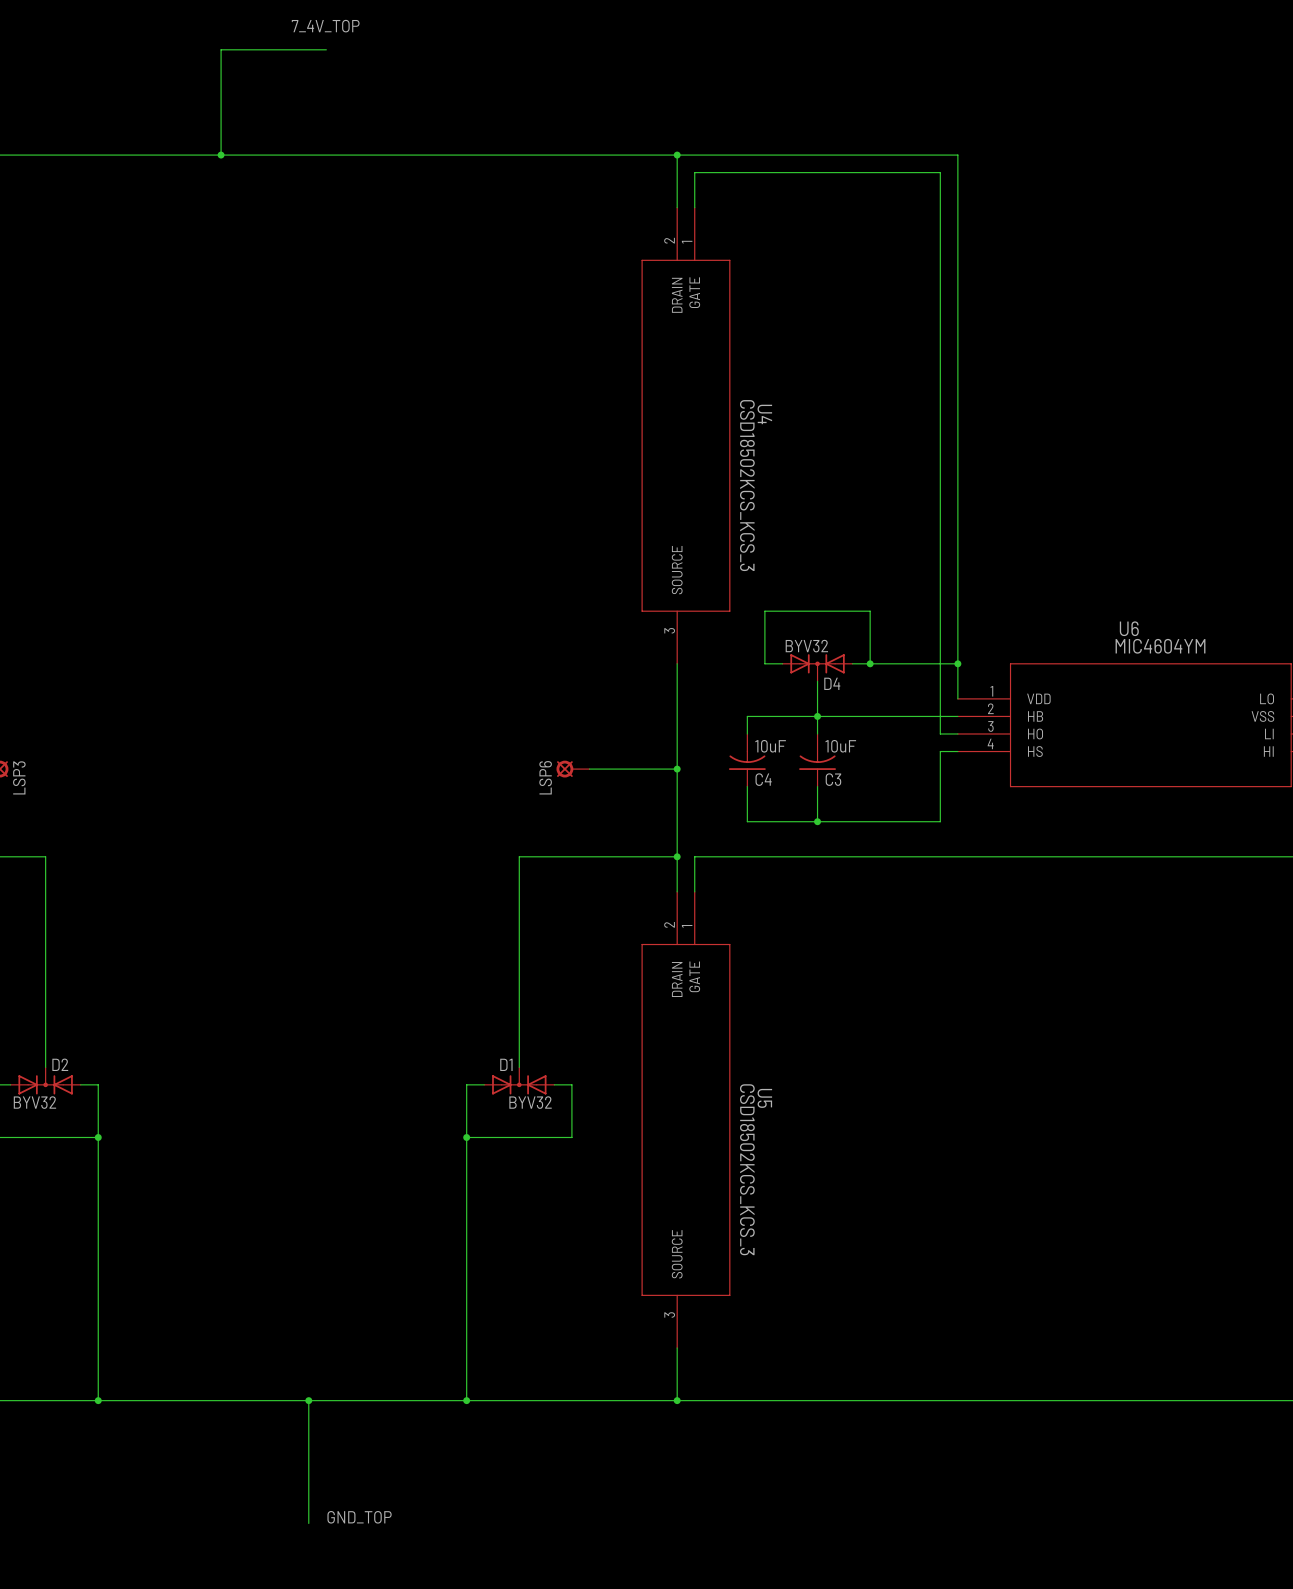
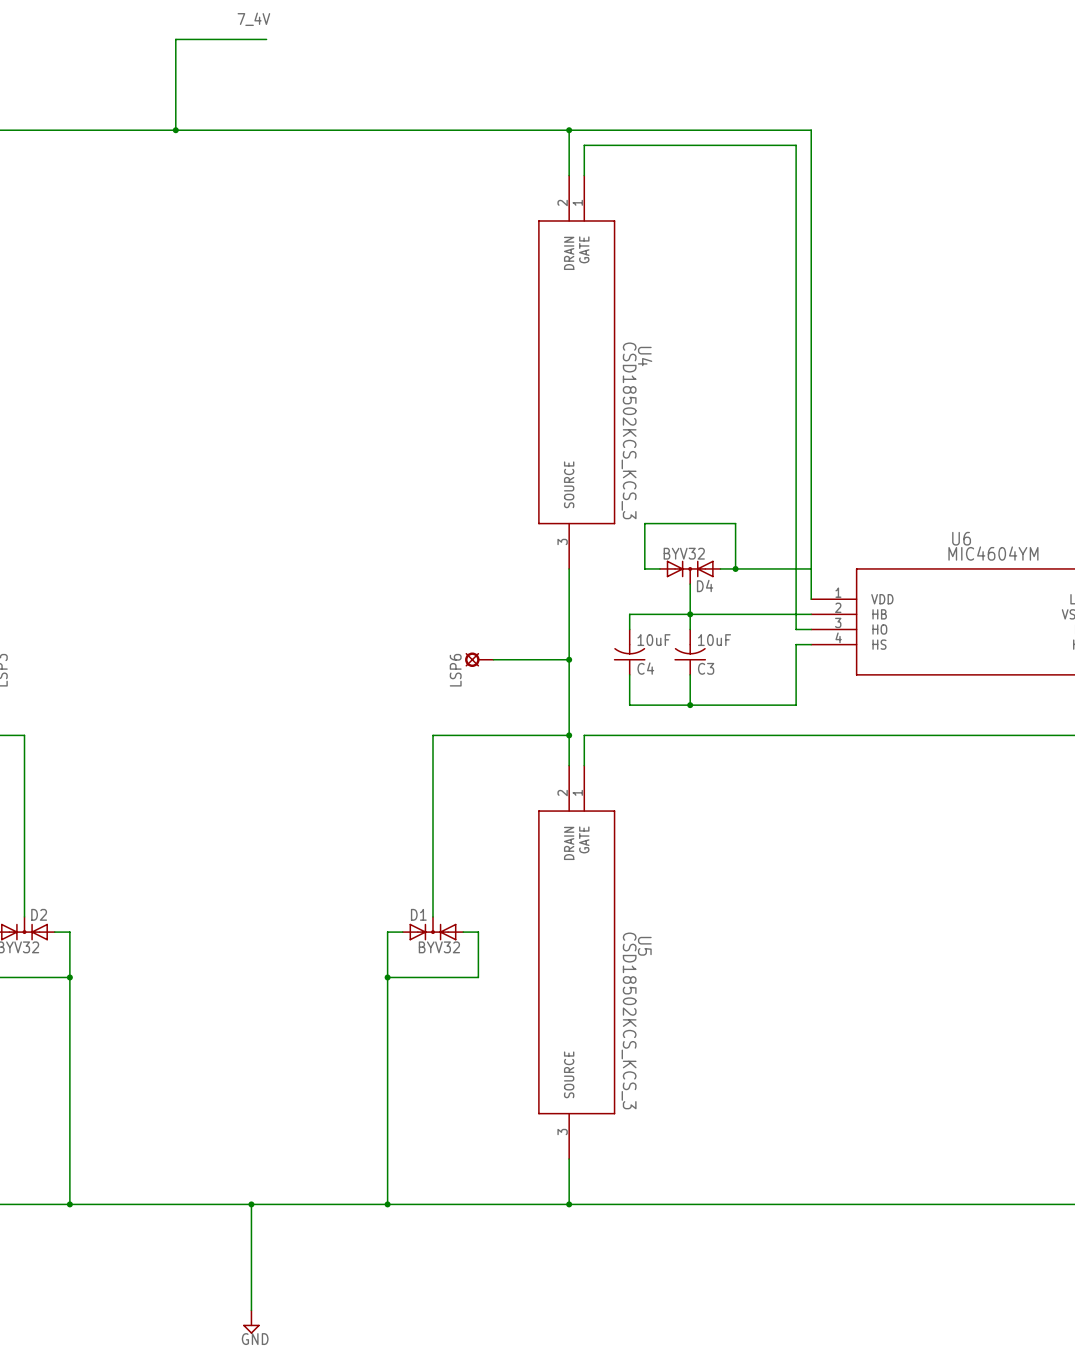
label: 7_4V_TOP (325, 26) -> 7_4V (253, 19)
junction: (957, 663) -> none
label: GND_TOP (359, 1517) -> none
power symbol: none -> GND (251, 1322)

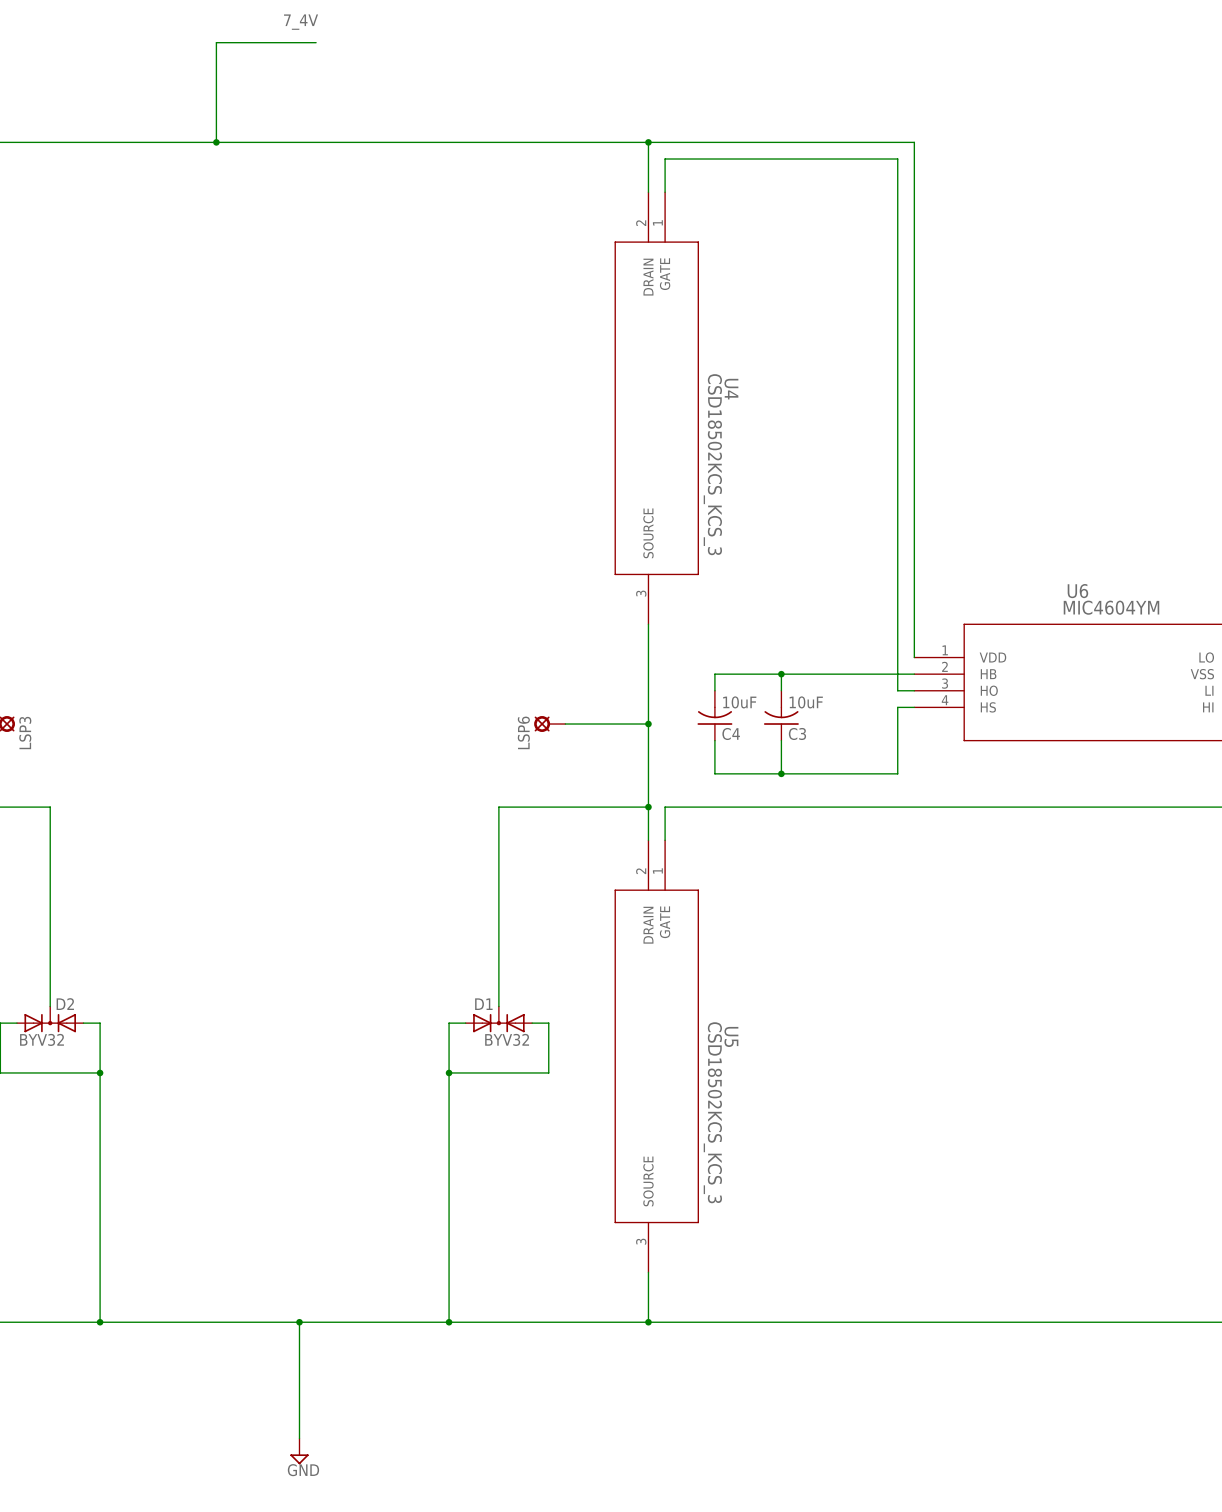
wire: (659, 568) (644, 568) (644, 523) (735, 523) (735, 568) -> none
wire: (720, 568) (811, 568) -> none
junction: (735, 568) -> none
D4: BYV32 (690, 572) -> none
wire: (690, 584) (690, 614) -> none

